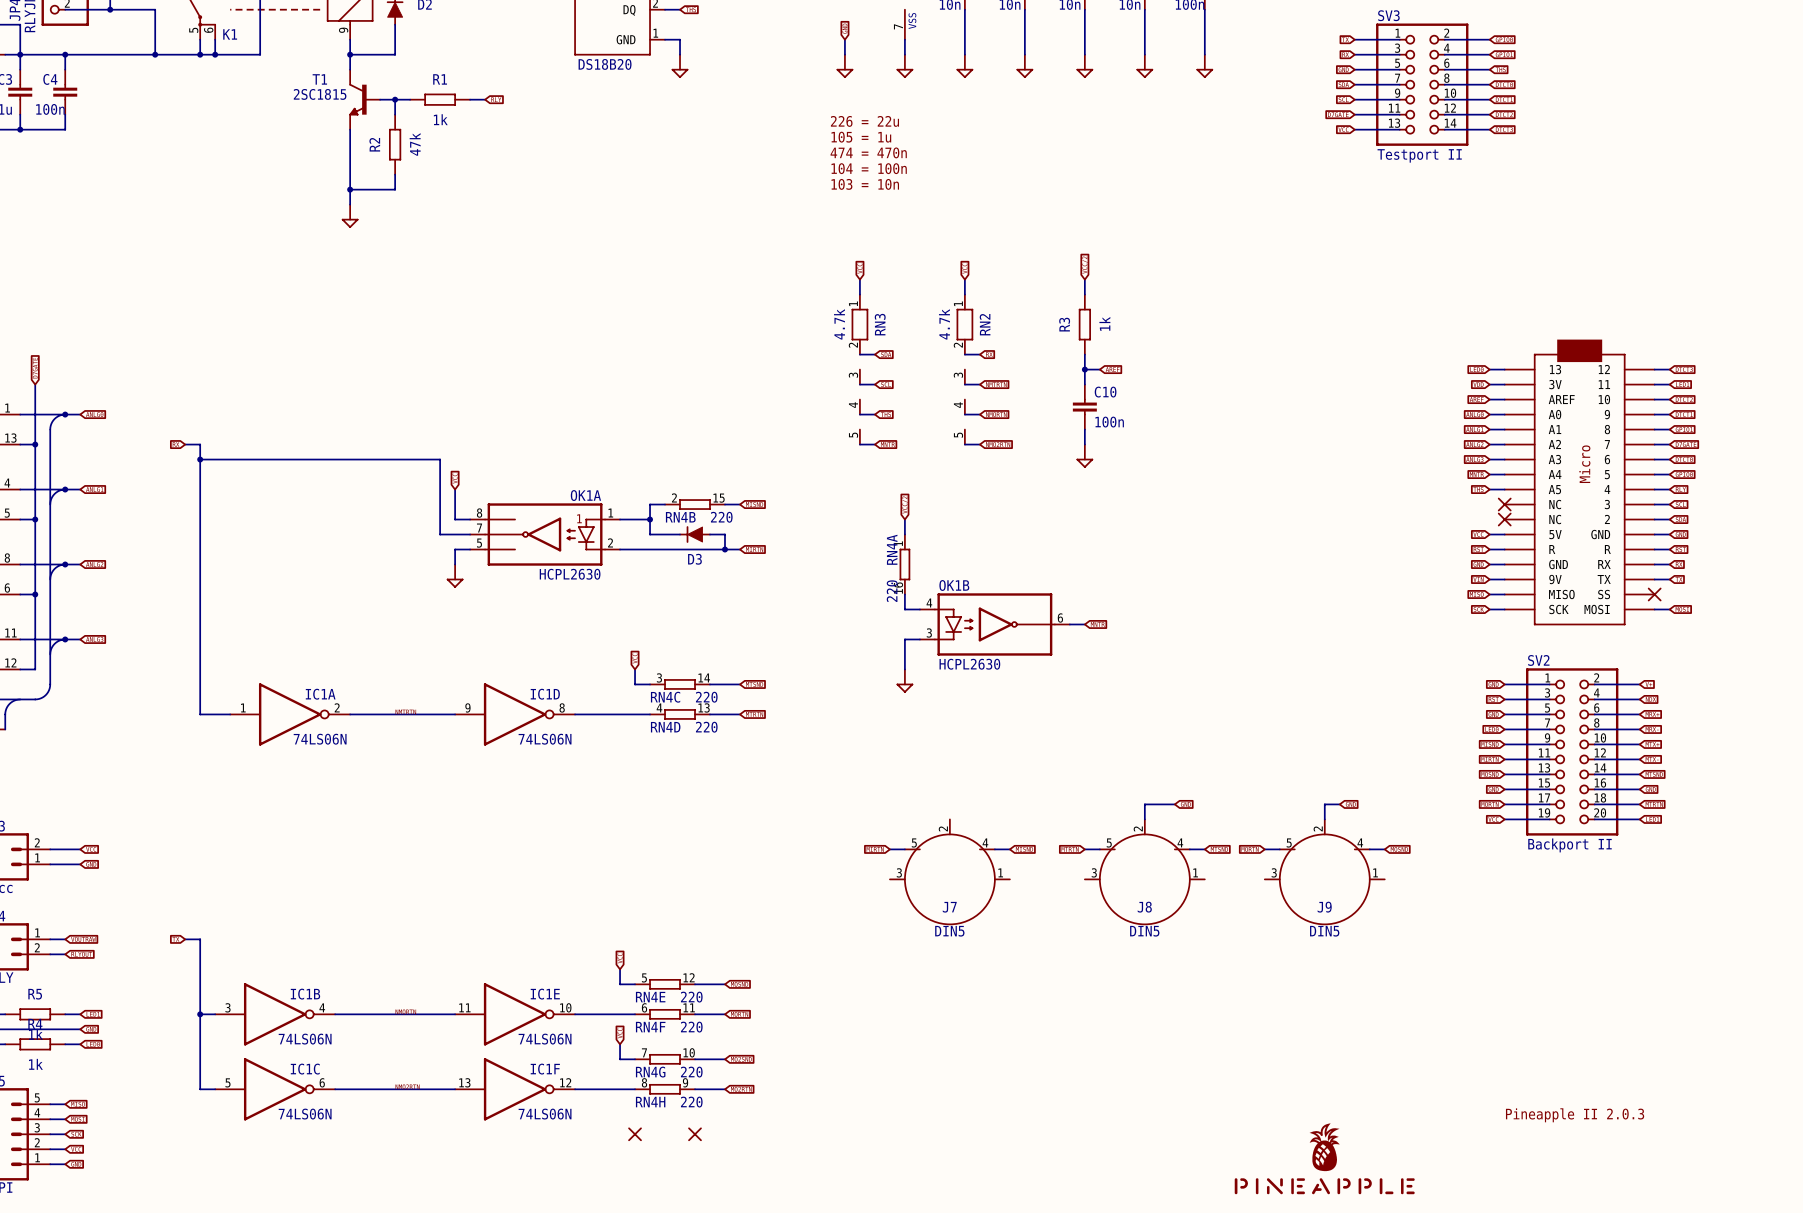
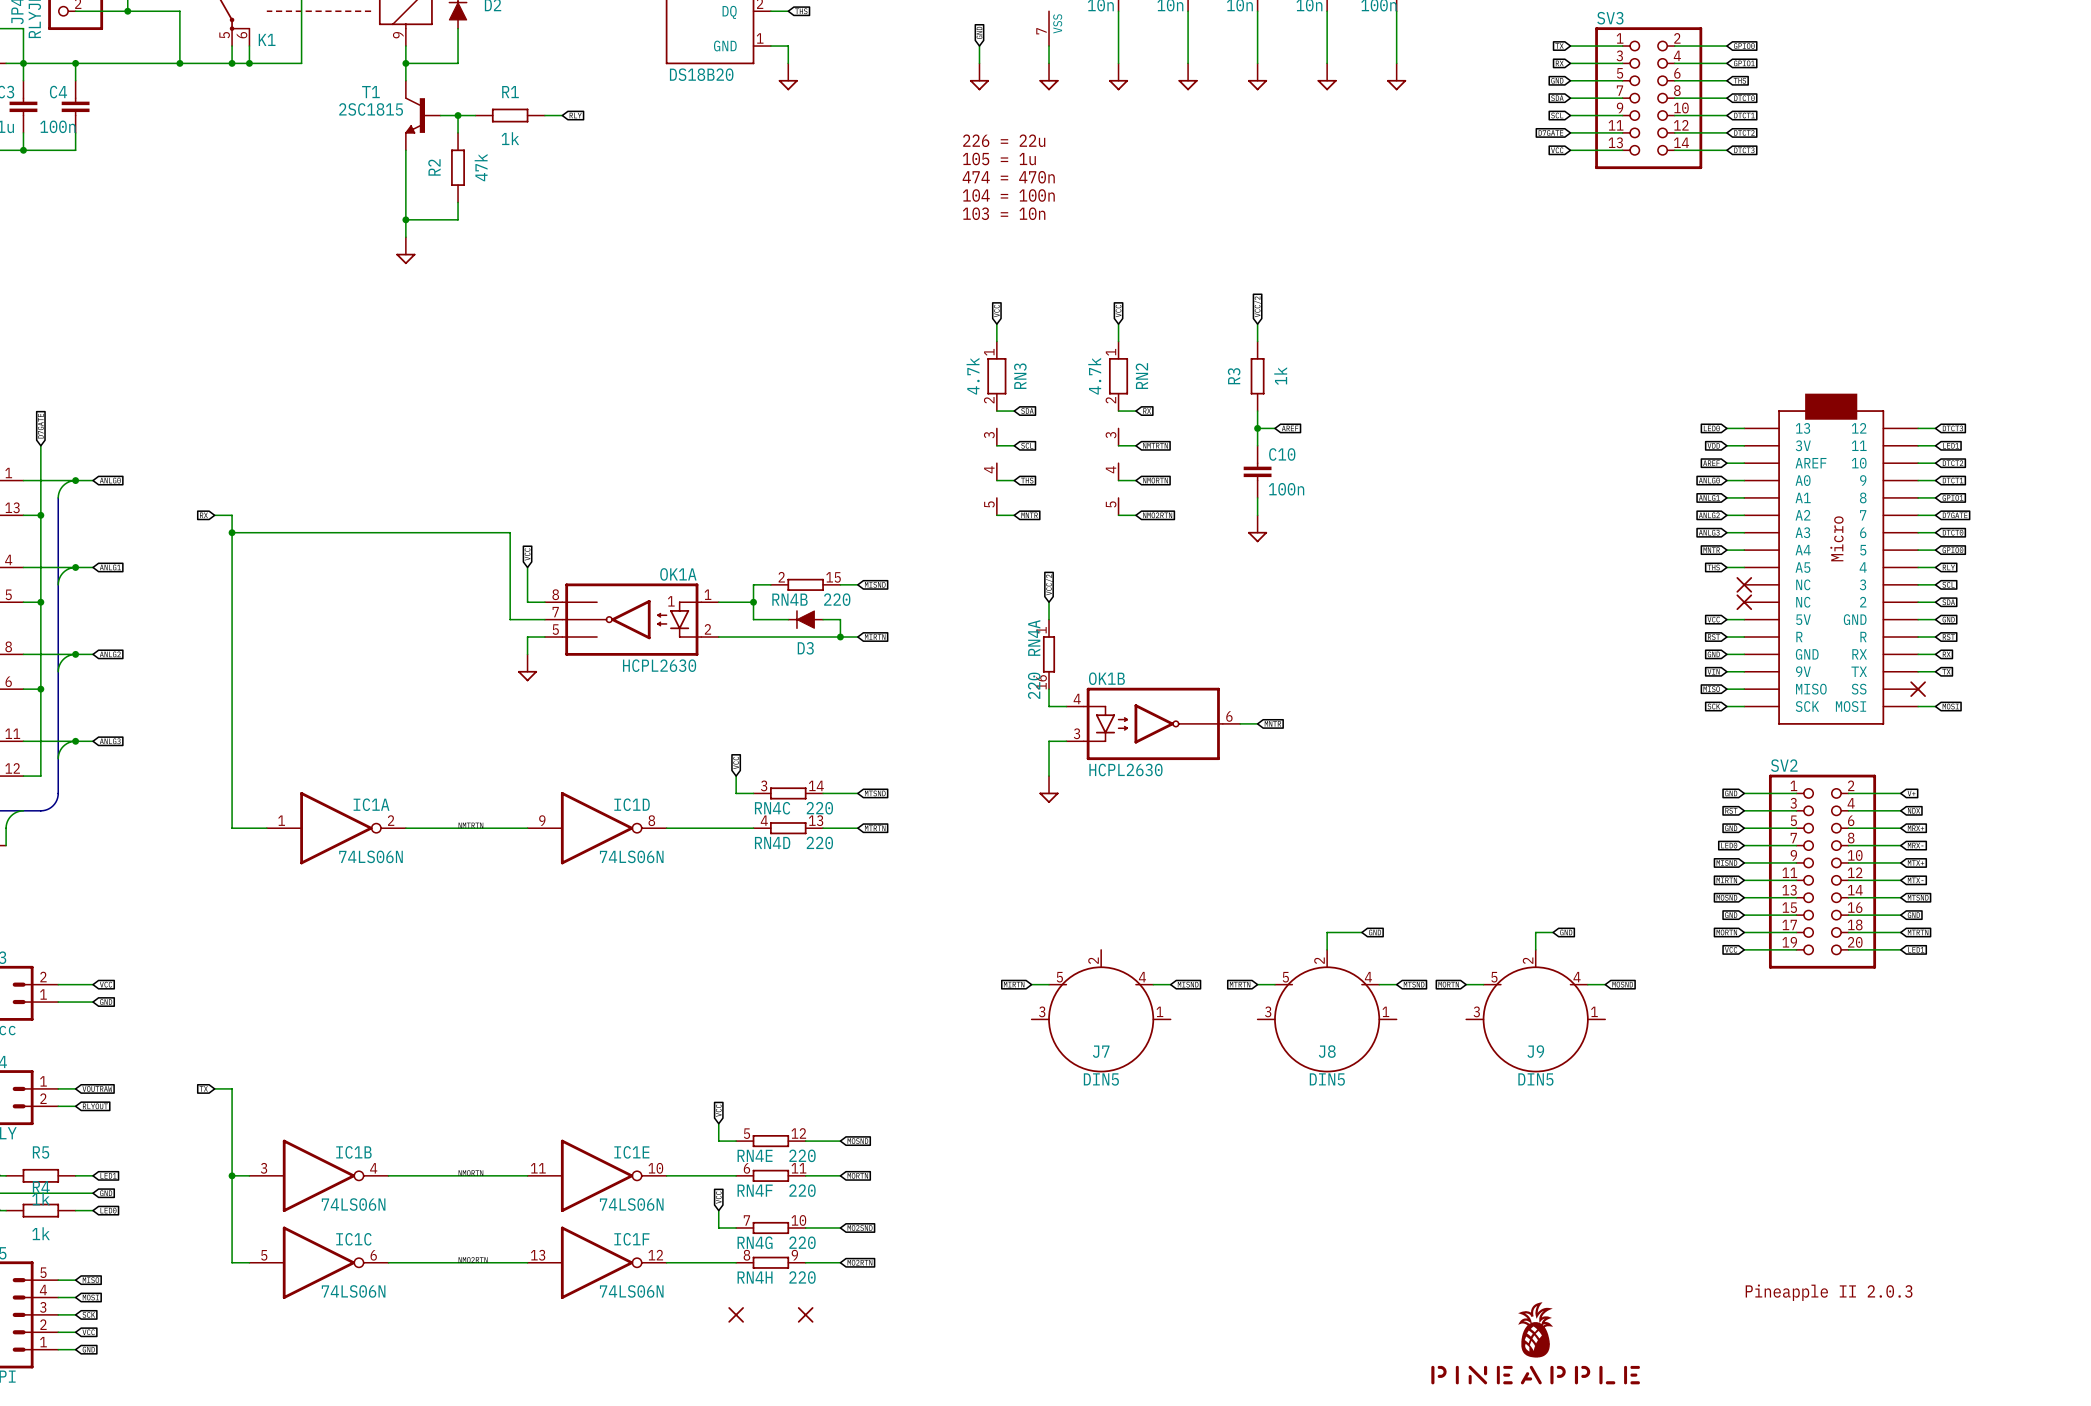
SV3 value: Testport II (1419, 155) -> none
SV2 value: Backport II (1569, 845) -> none

